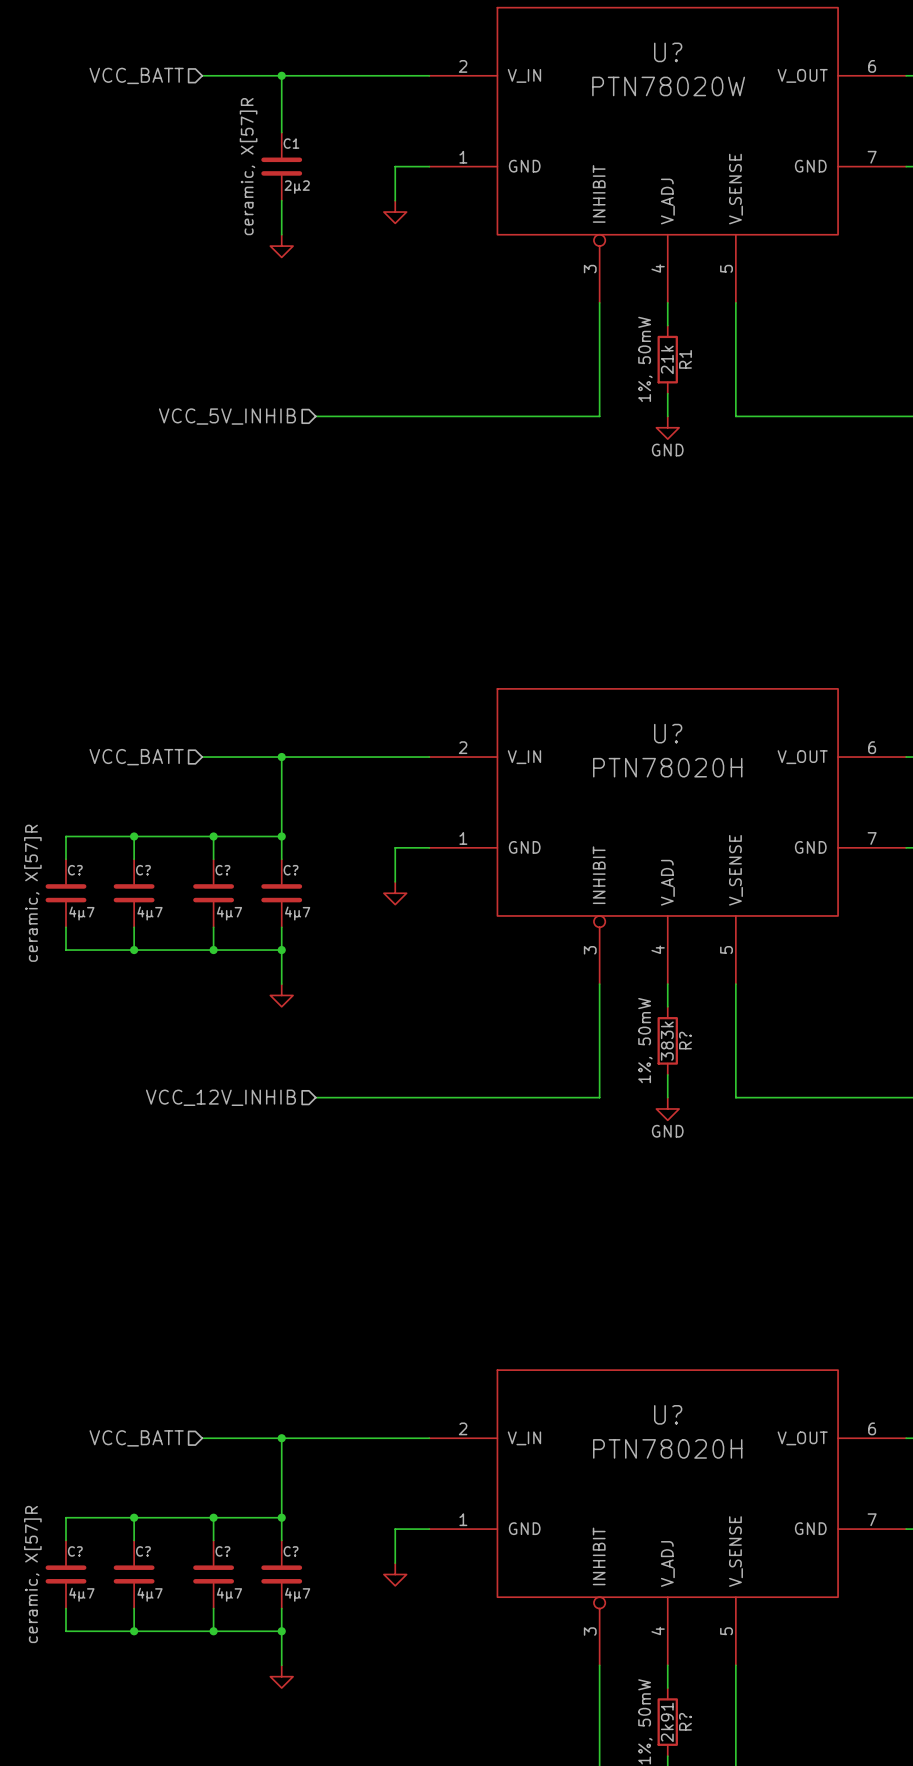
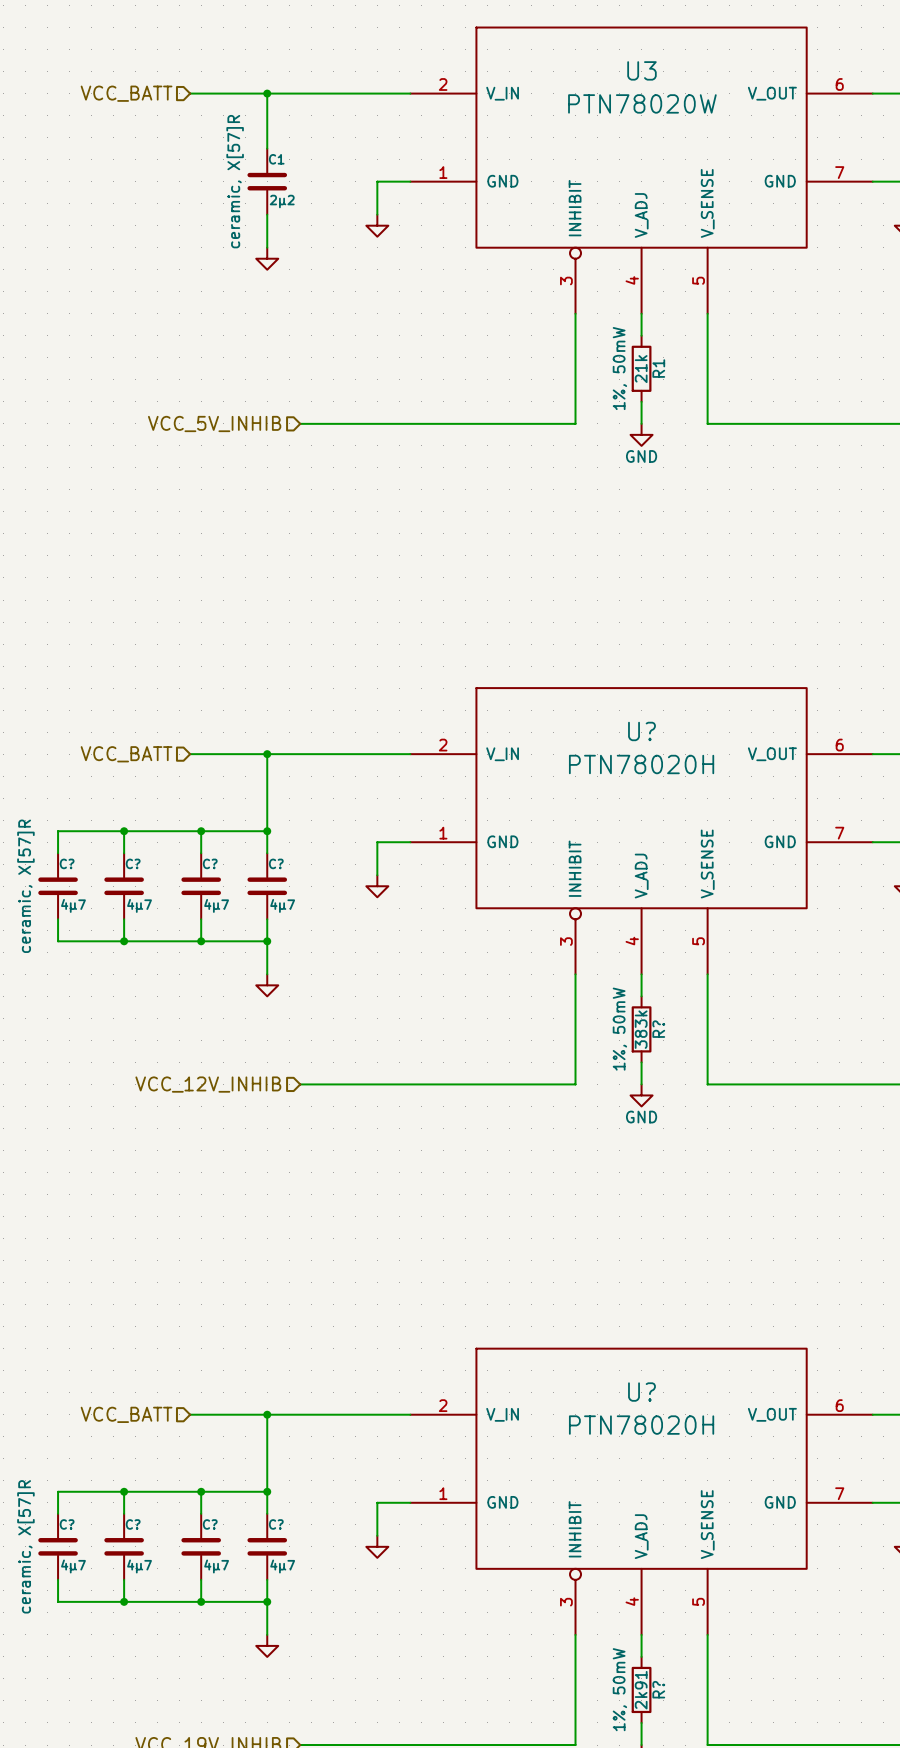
U? name: U? (668, 52) -> U3 (641, 70)

